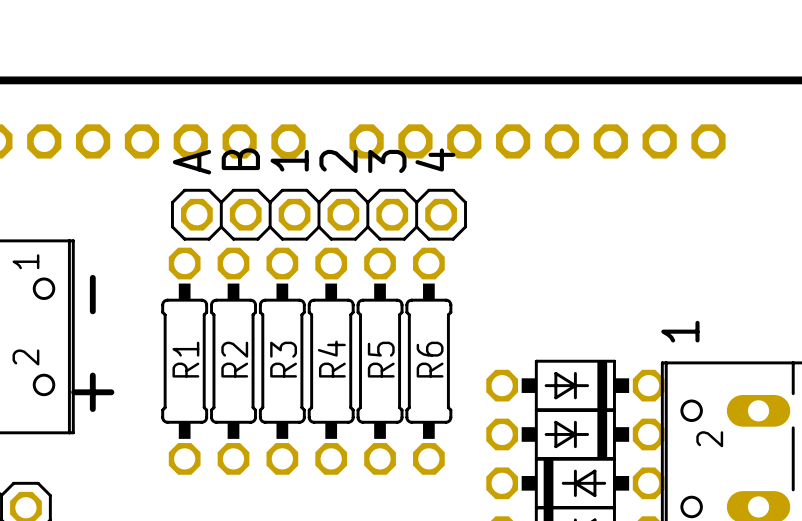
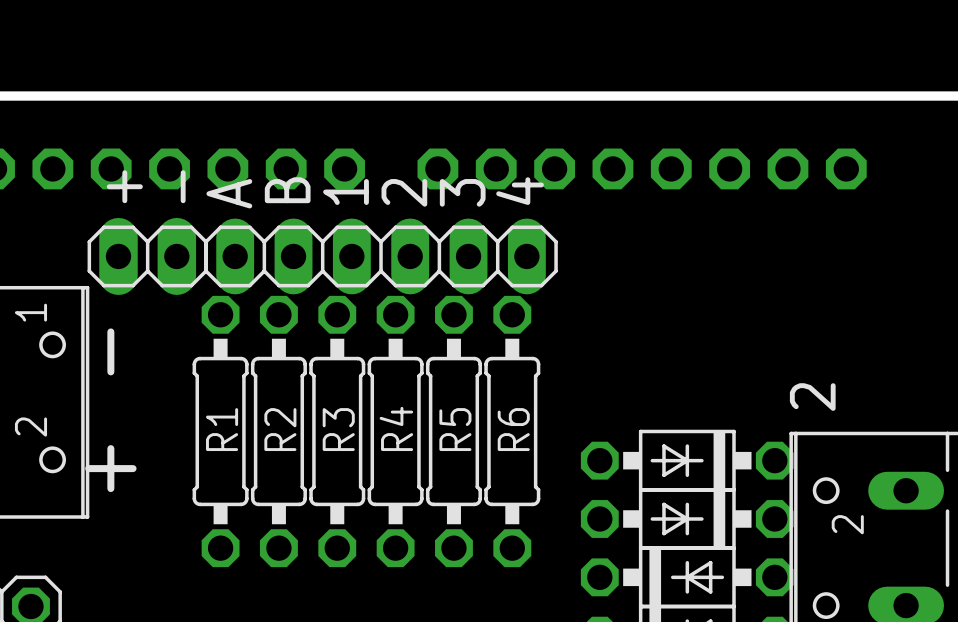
text: none -> + (124, 186)
text: none -> - (183, 186)
part footprint: [171, 188, 467, 241] -> [204, 218, 558, 295]
part: none -> (147, 256)
text: 1 (680, 331) -> 2 (812, 397)

